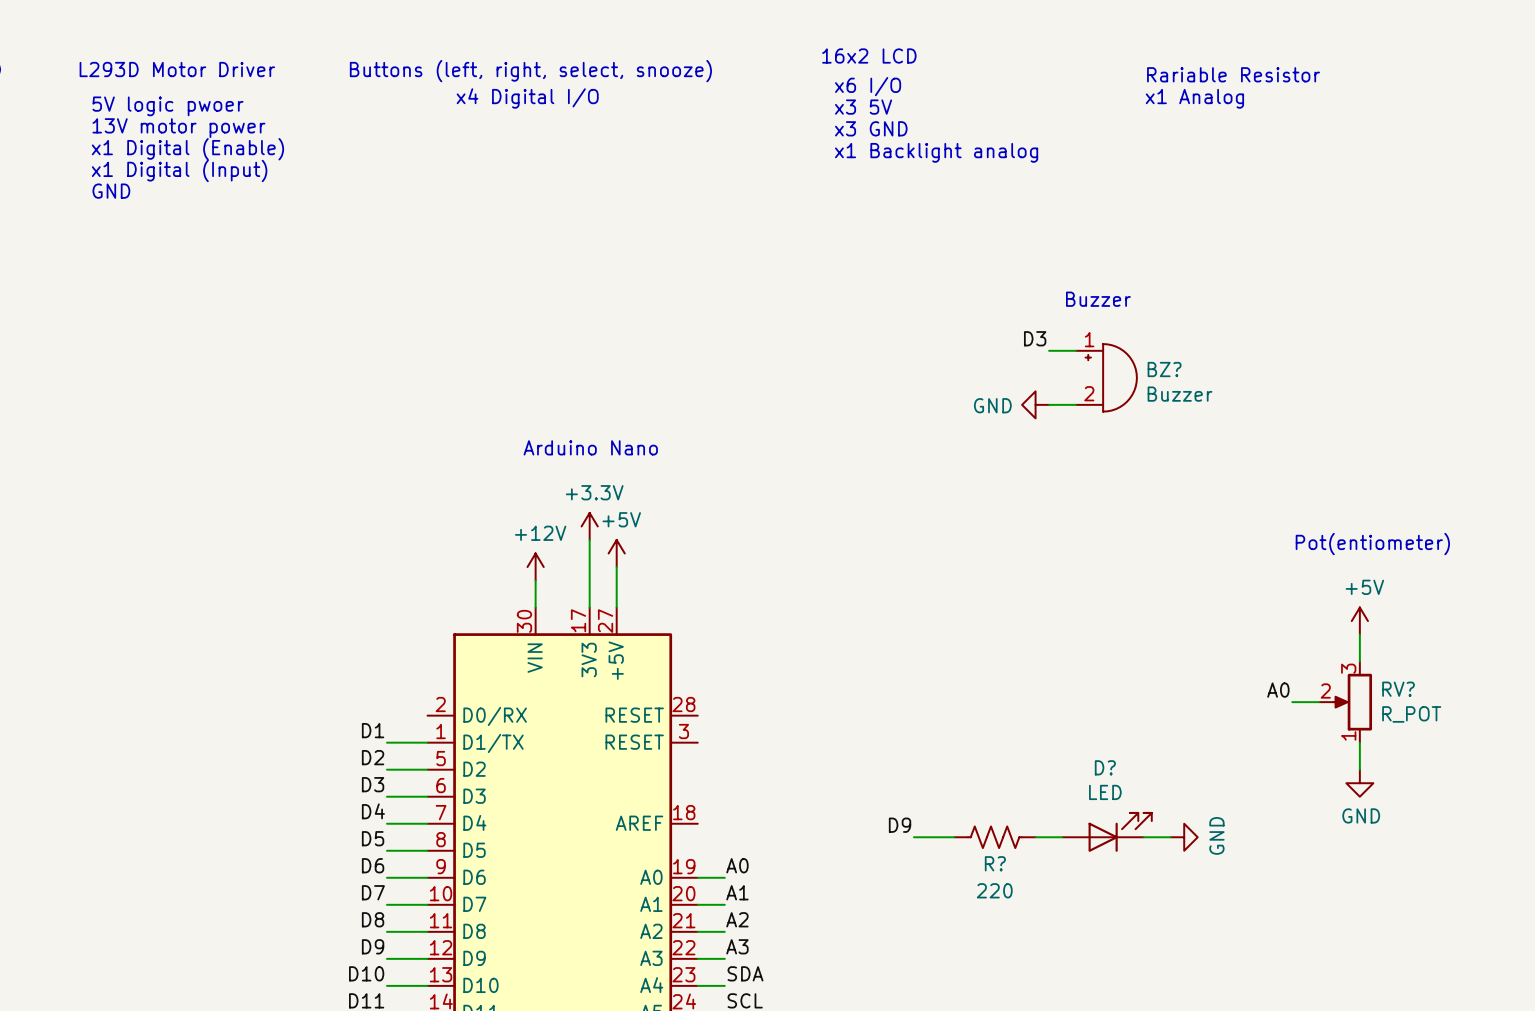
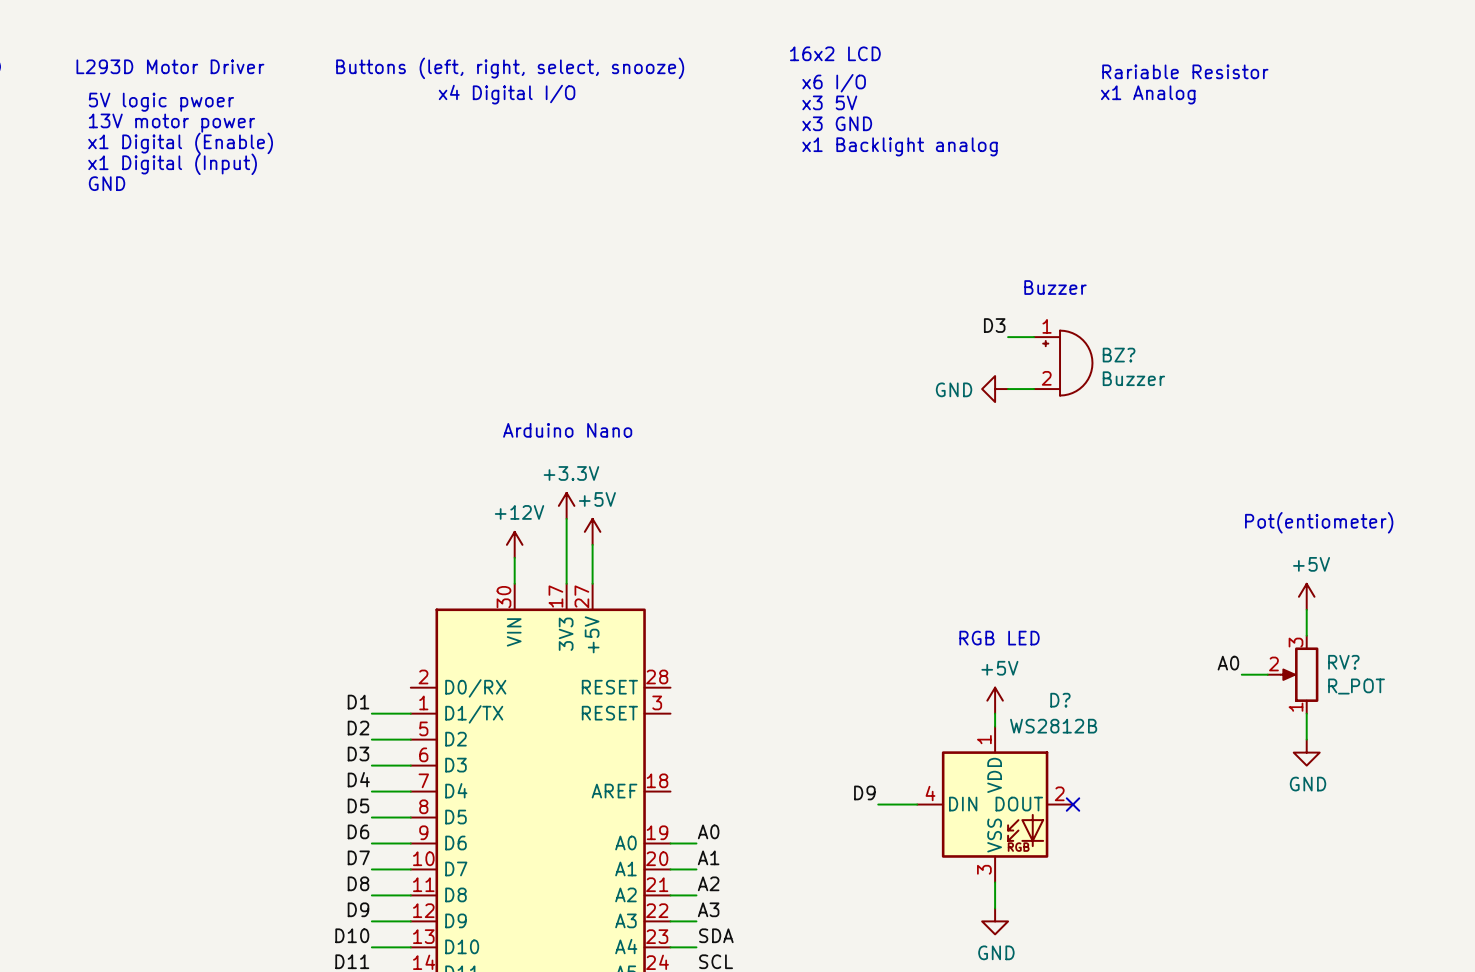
text: none -> RGB LED (999, 638)
power symbol: none -> +5V (995, 700)
wire: none -> (995, 713) (995, 726)
D?: LED (1107, 832) -> none
R?: 220 (995, 837) -> none
D?: none -> WS2812B (995, 804)
no-connect mark: none -> (1073, 804)
wire: (1143, 837) (1170, 837) -> none
power symbol rotation: 0° (1184, 837) -> 90° clockwise (995, 921)
power symbol position: GND (1184, 837) -> GND (995, 921)
wire: none -> (995, 882) (995, 908)

